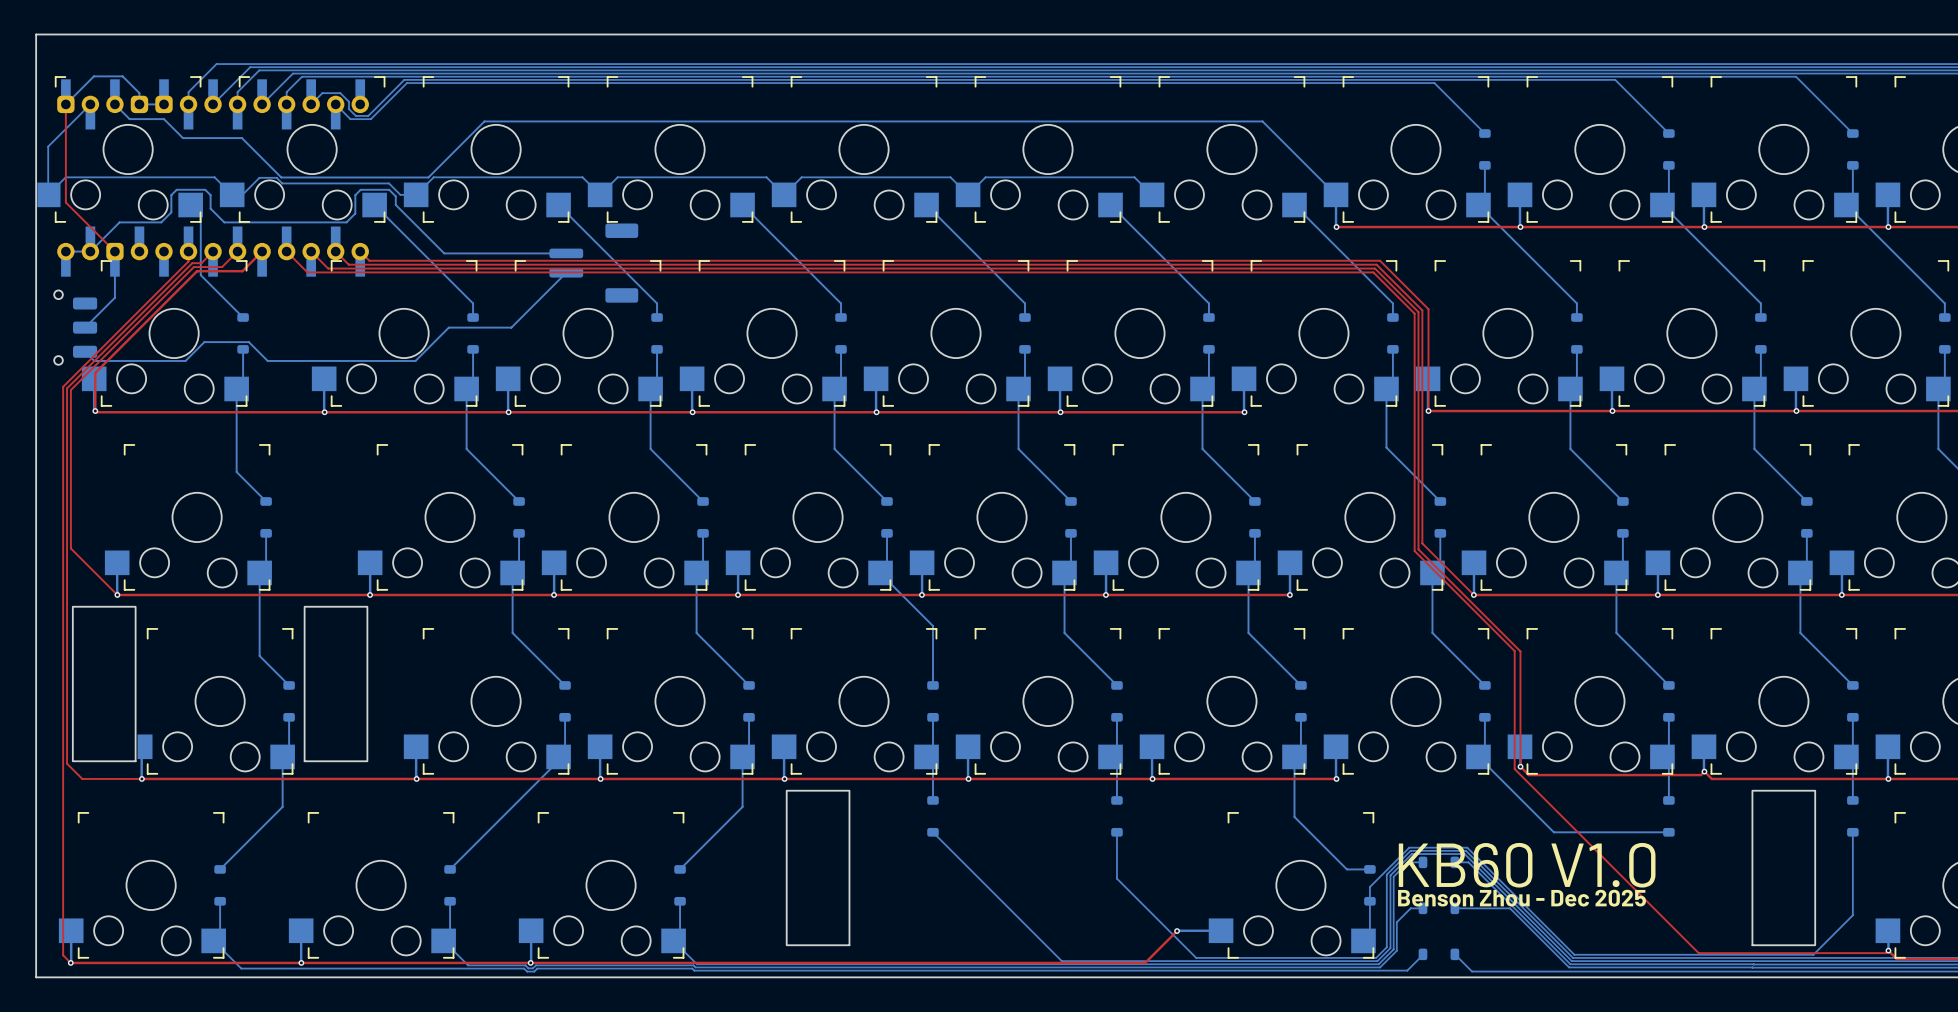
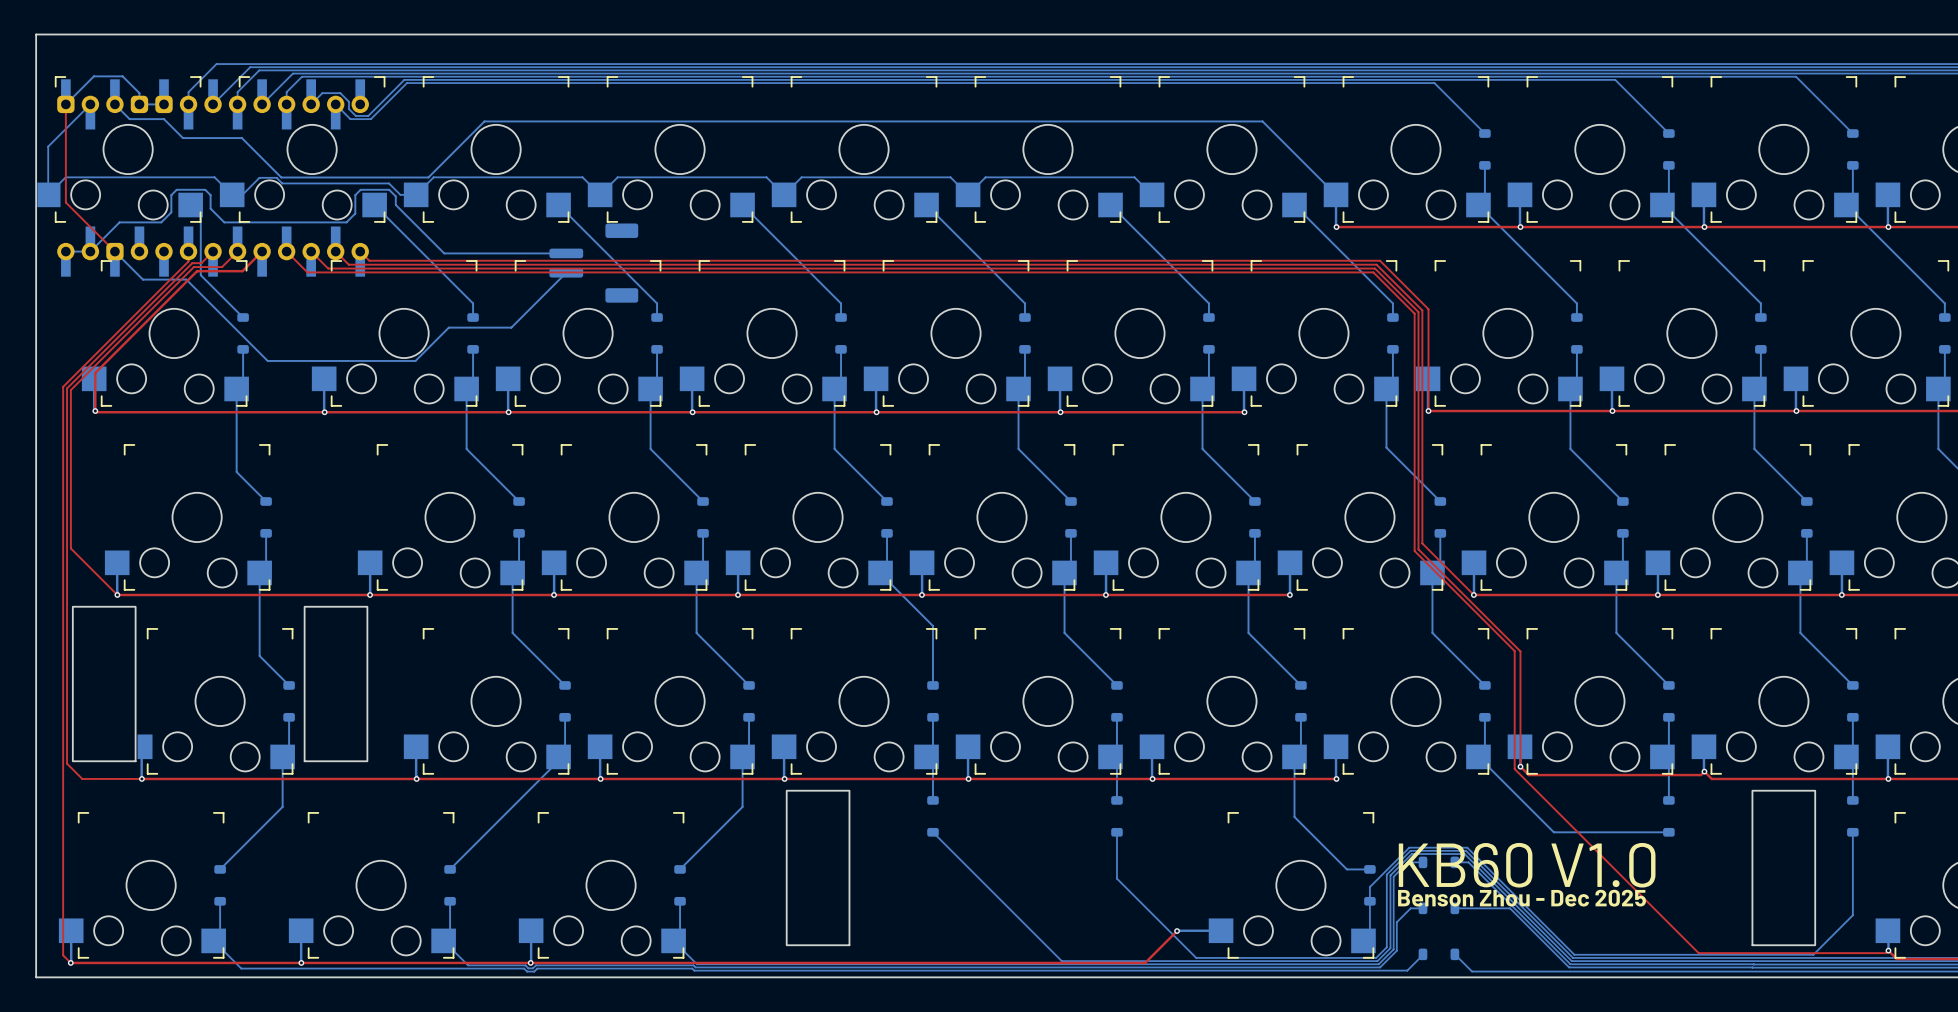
bottom track: (114, 267) (114, 297) (85, 327) -> none
part: (75, 327) -> none
bottom track: (248, 342) (204, 342) (185, 360) (94, 360) (85, 351) -> (248, 342) (186, 279) (142, 279) (114, 251)

